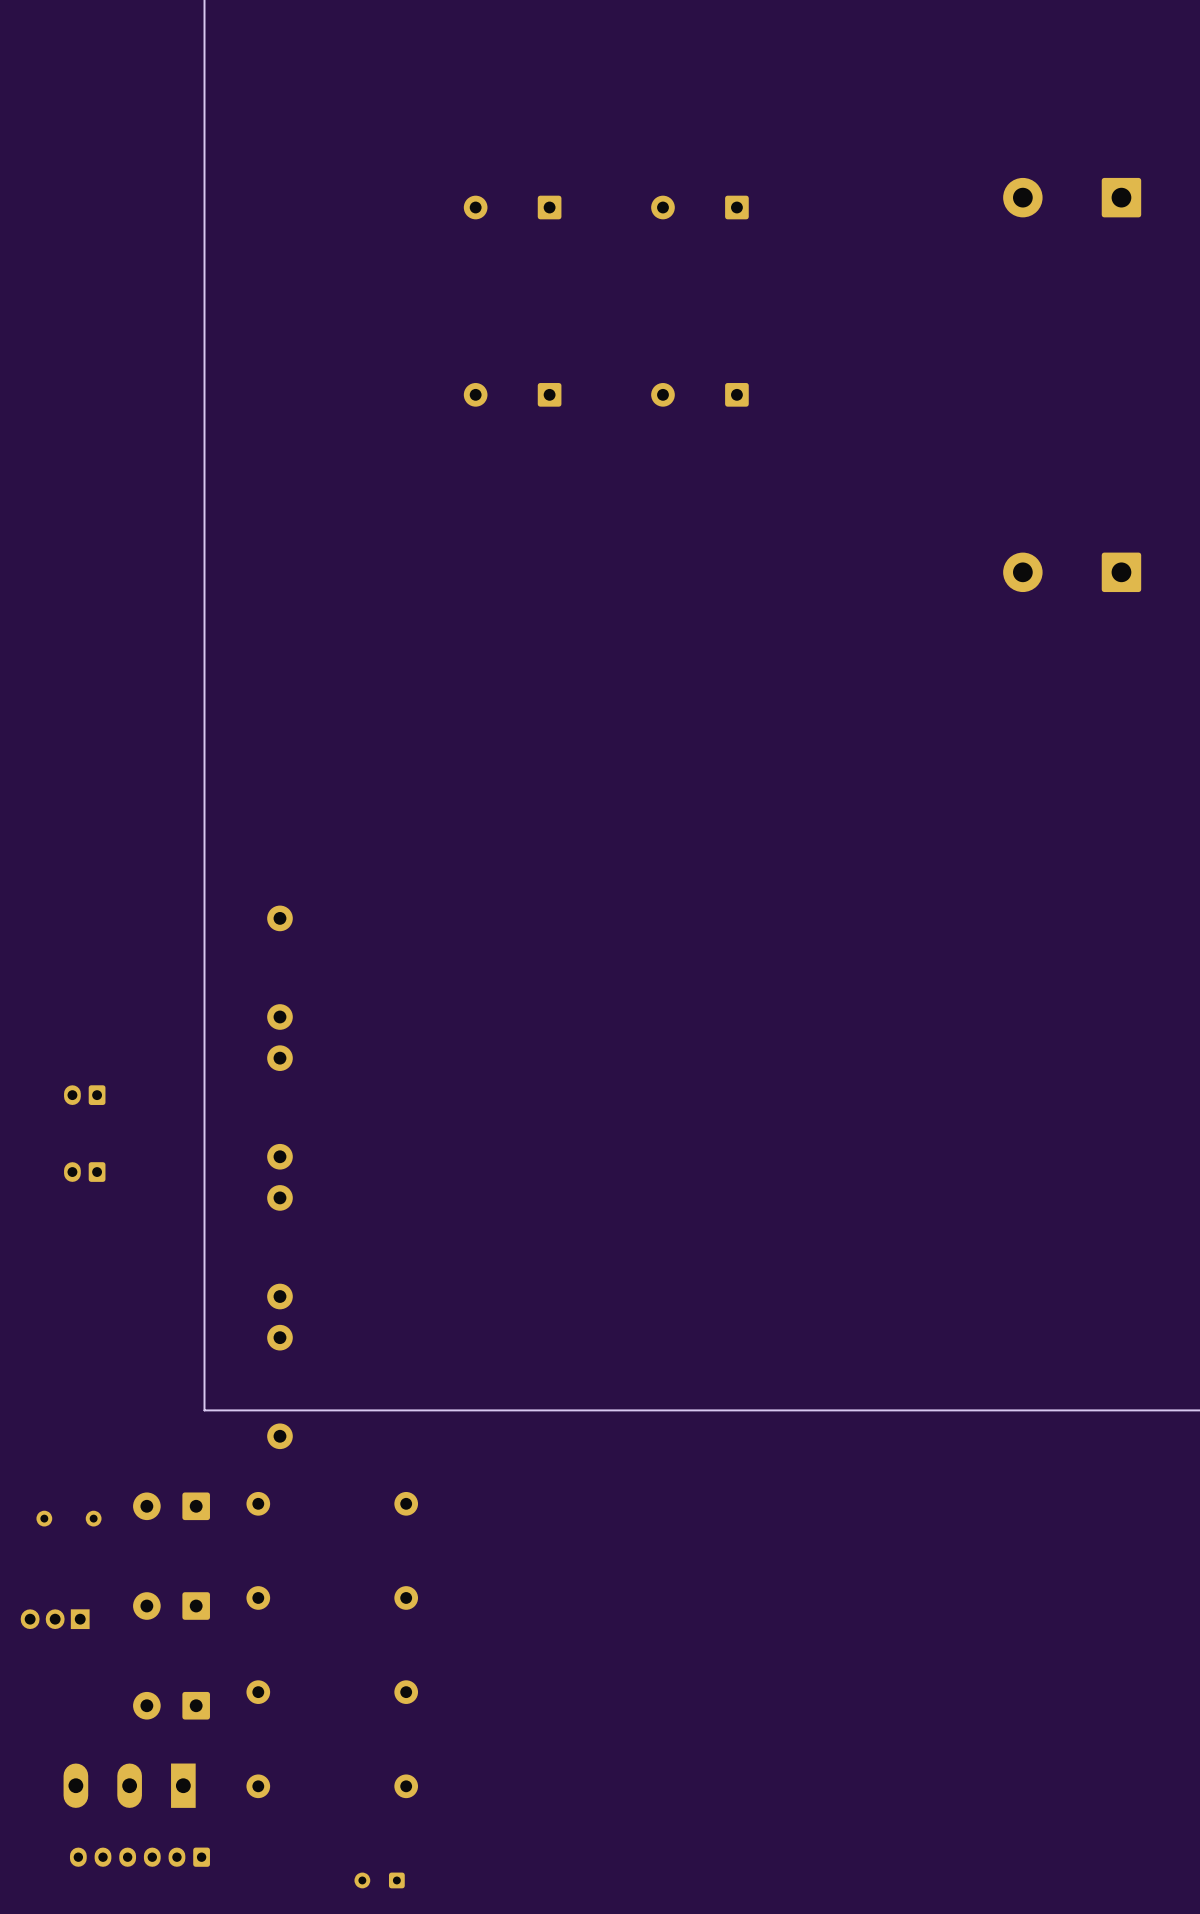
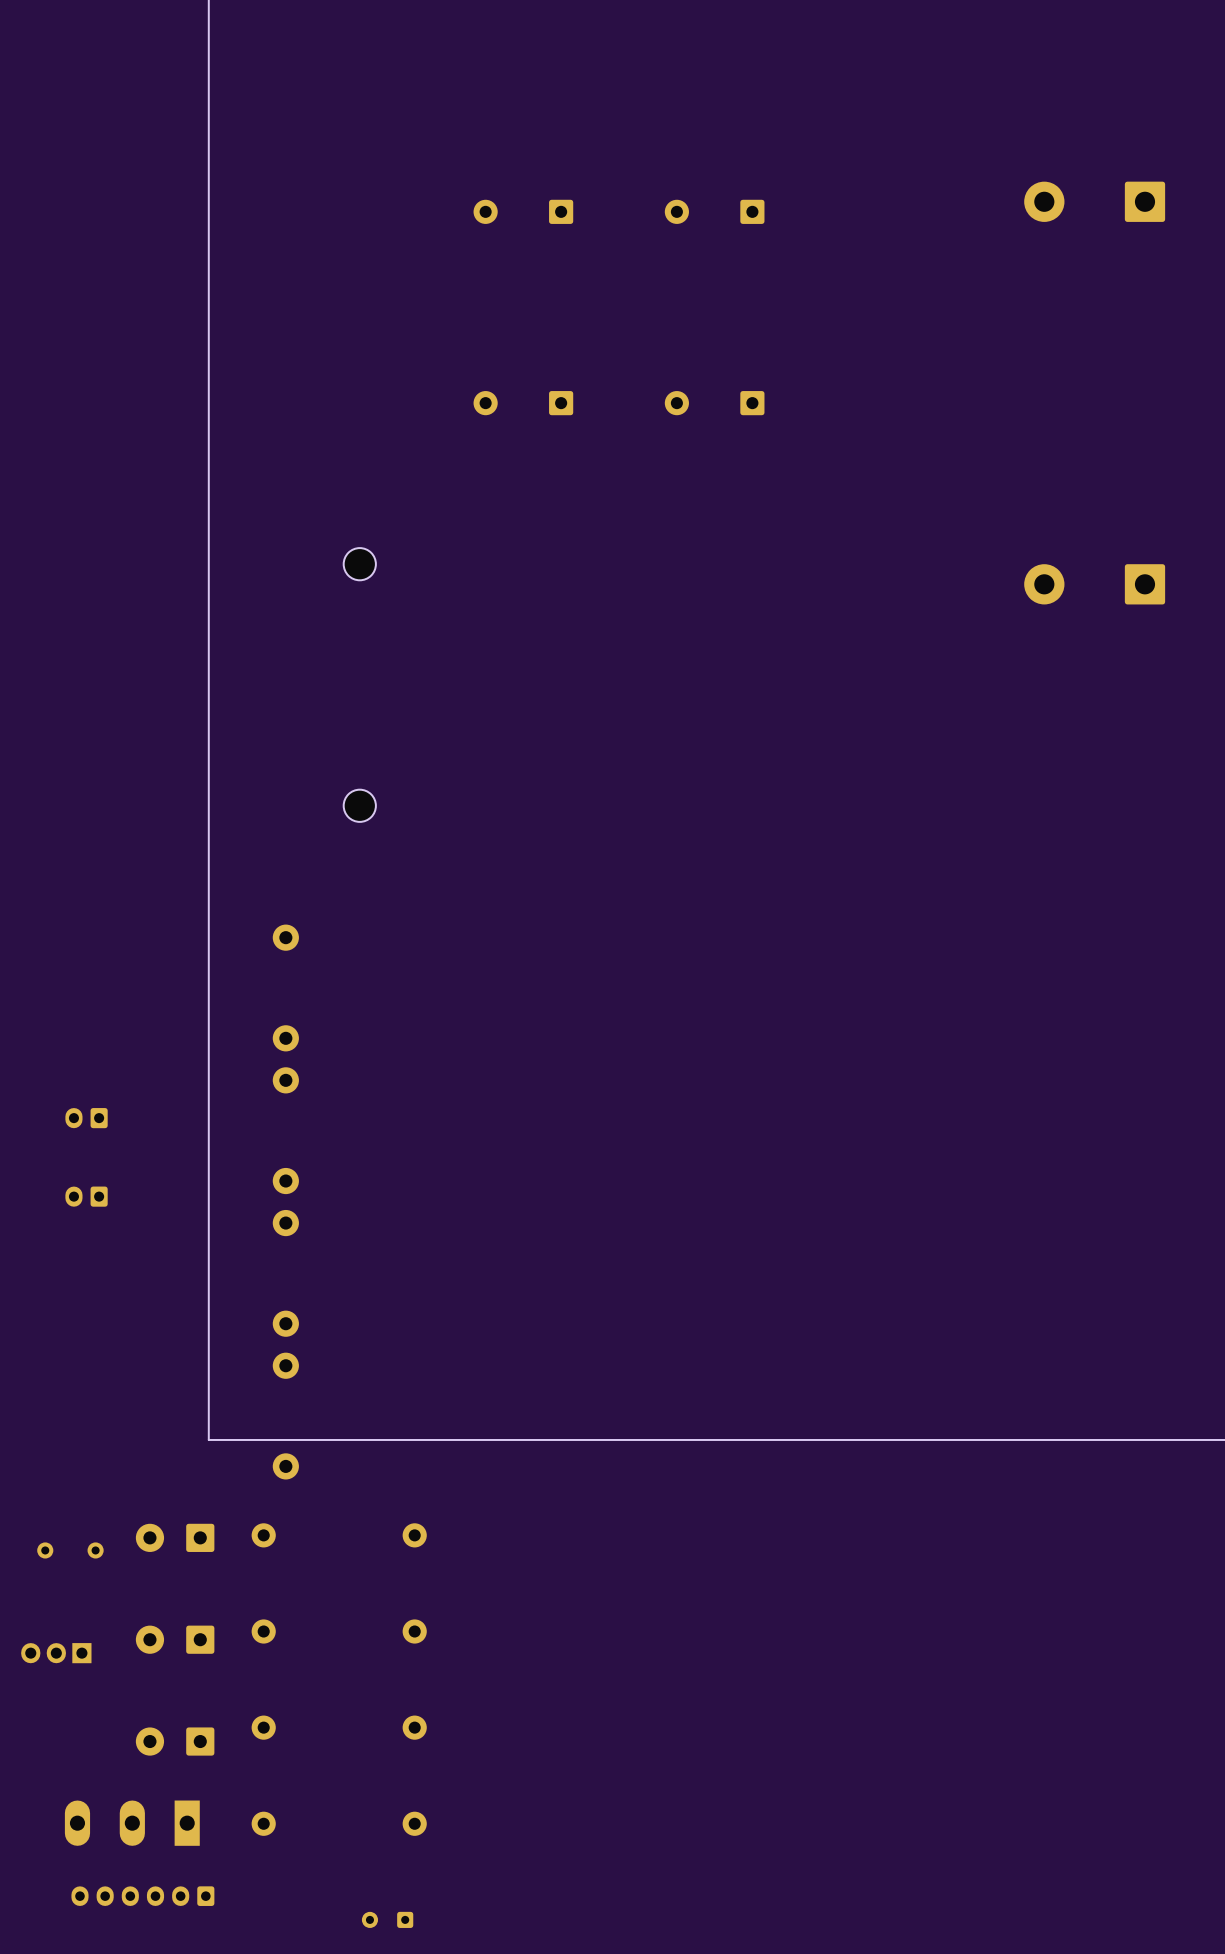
part: none -> (359, 564)
part: none -> (359, 805)

